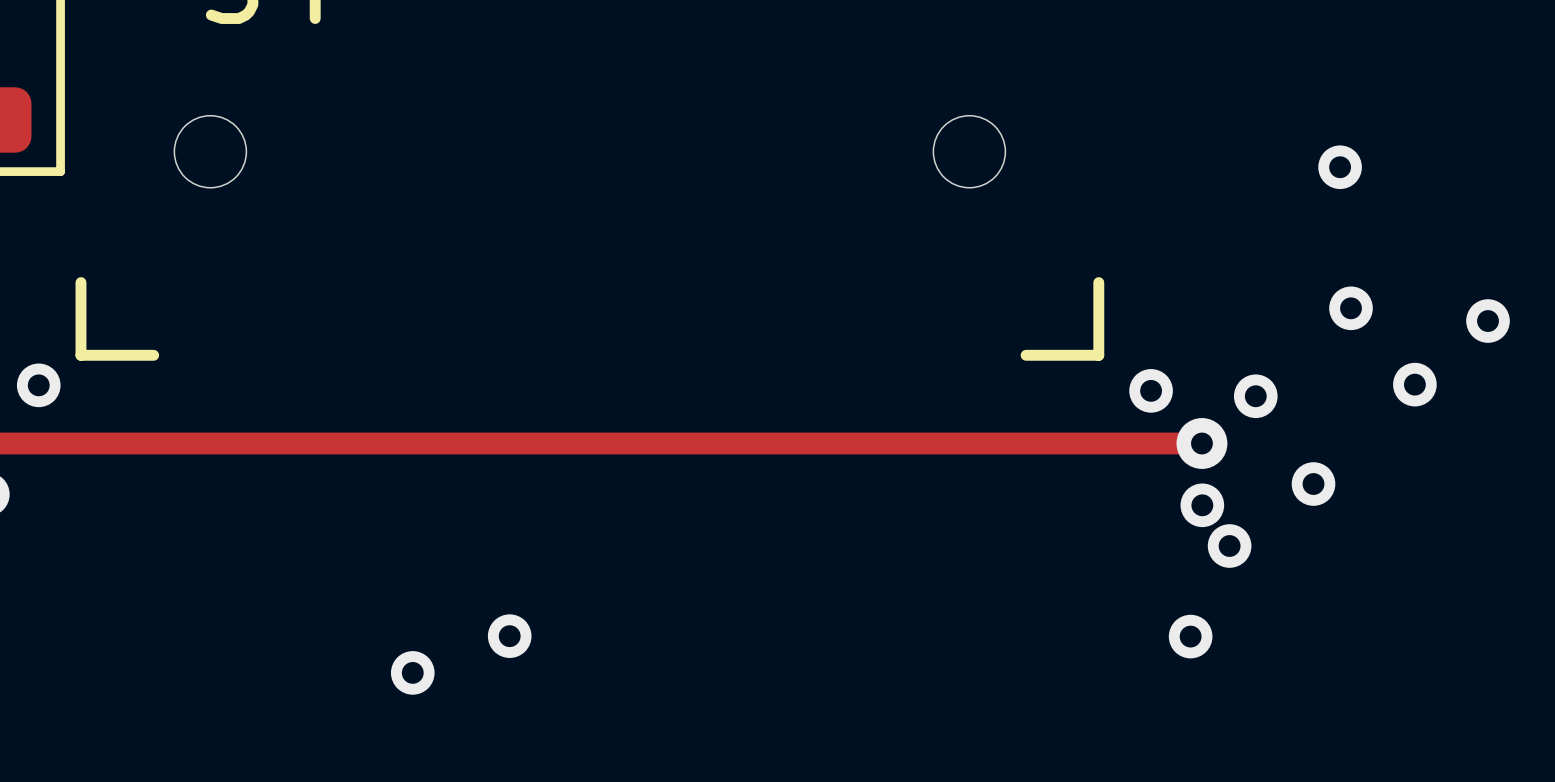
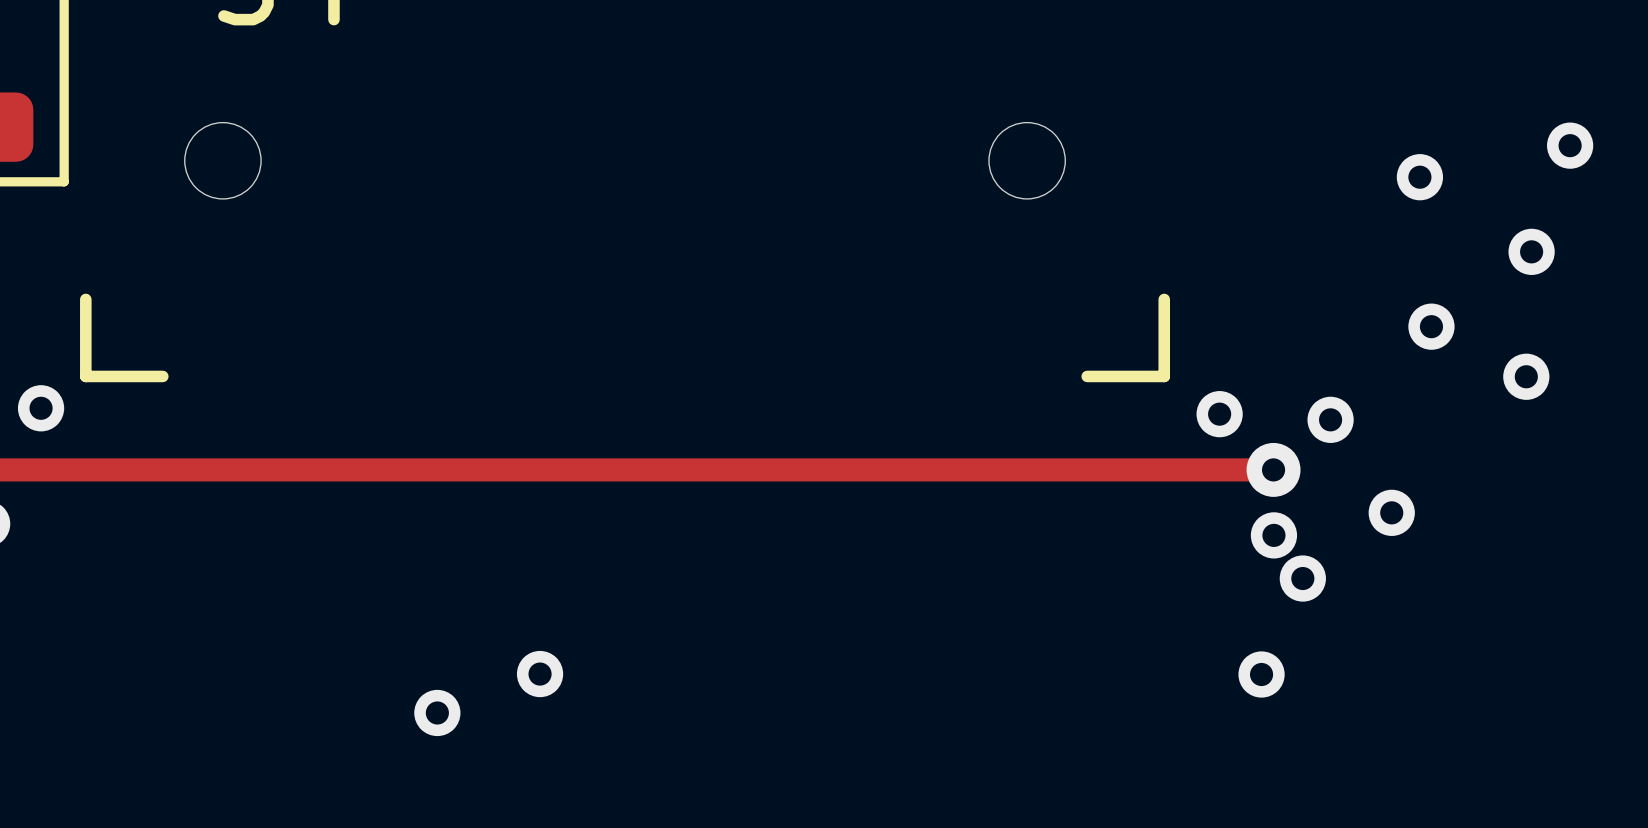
via: none -> (1570, 145)
via: none -> (1531, 251)
via: (1488, 321) -> none
via position: (1414, 384) -> (1526, 376)

